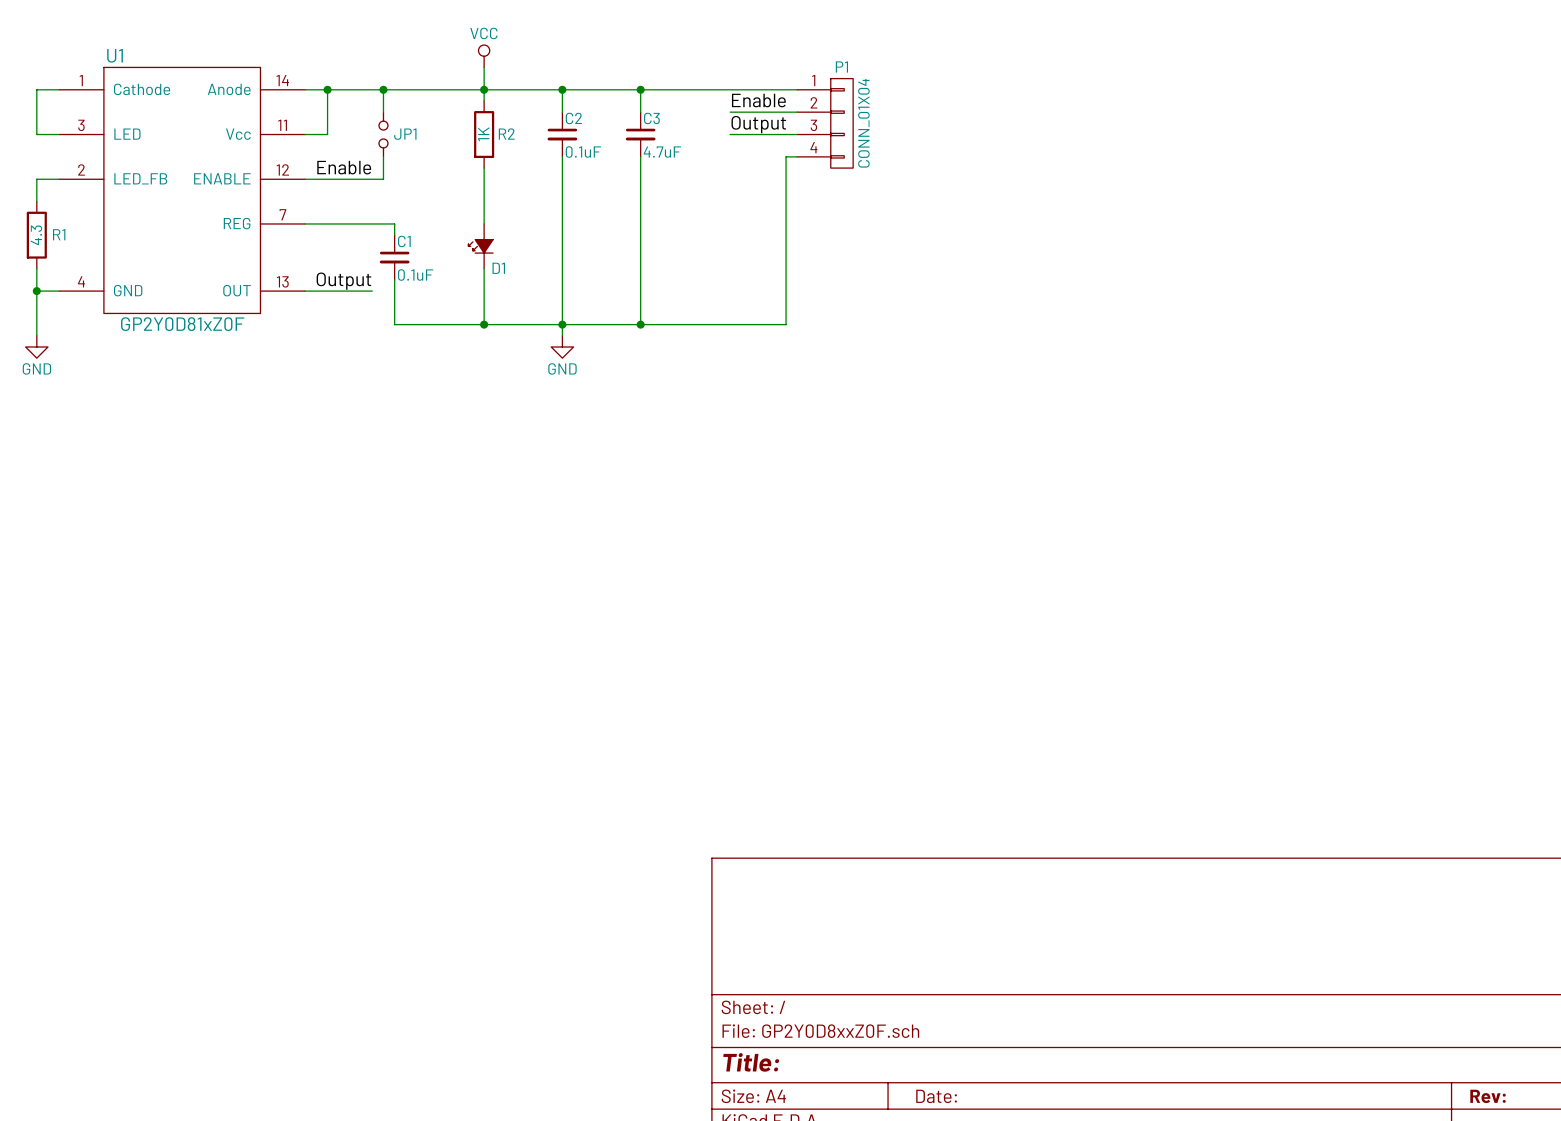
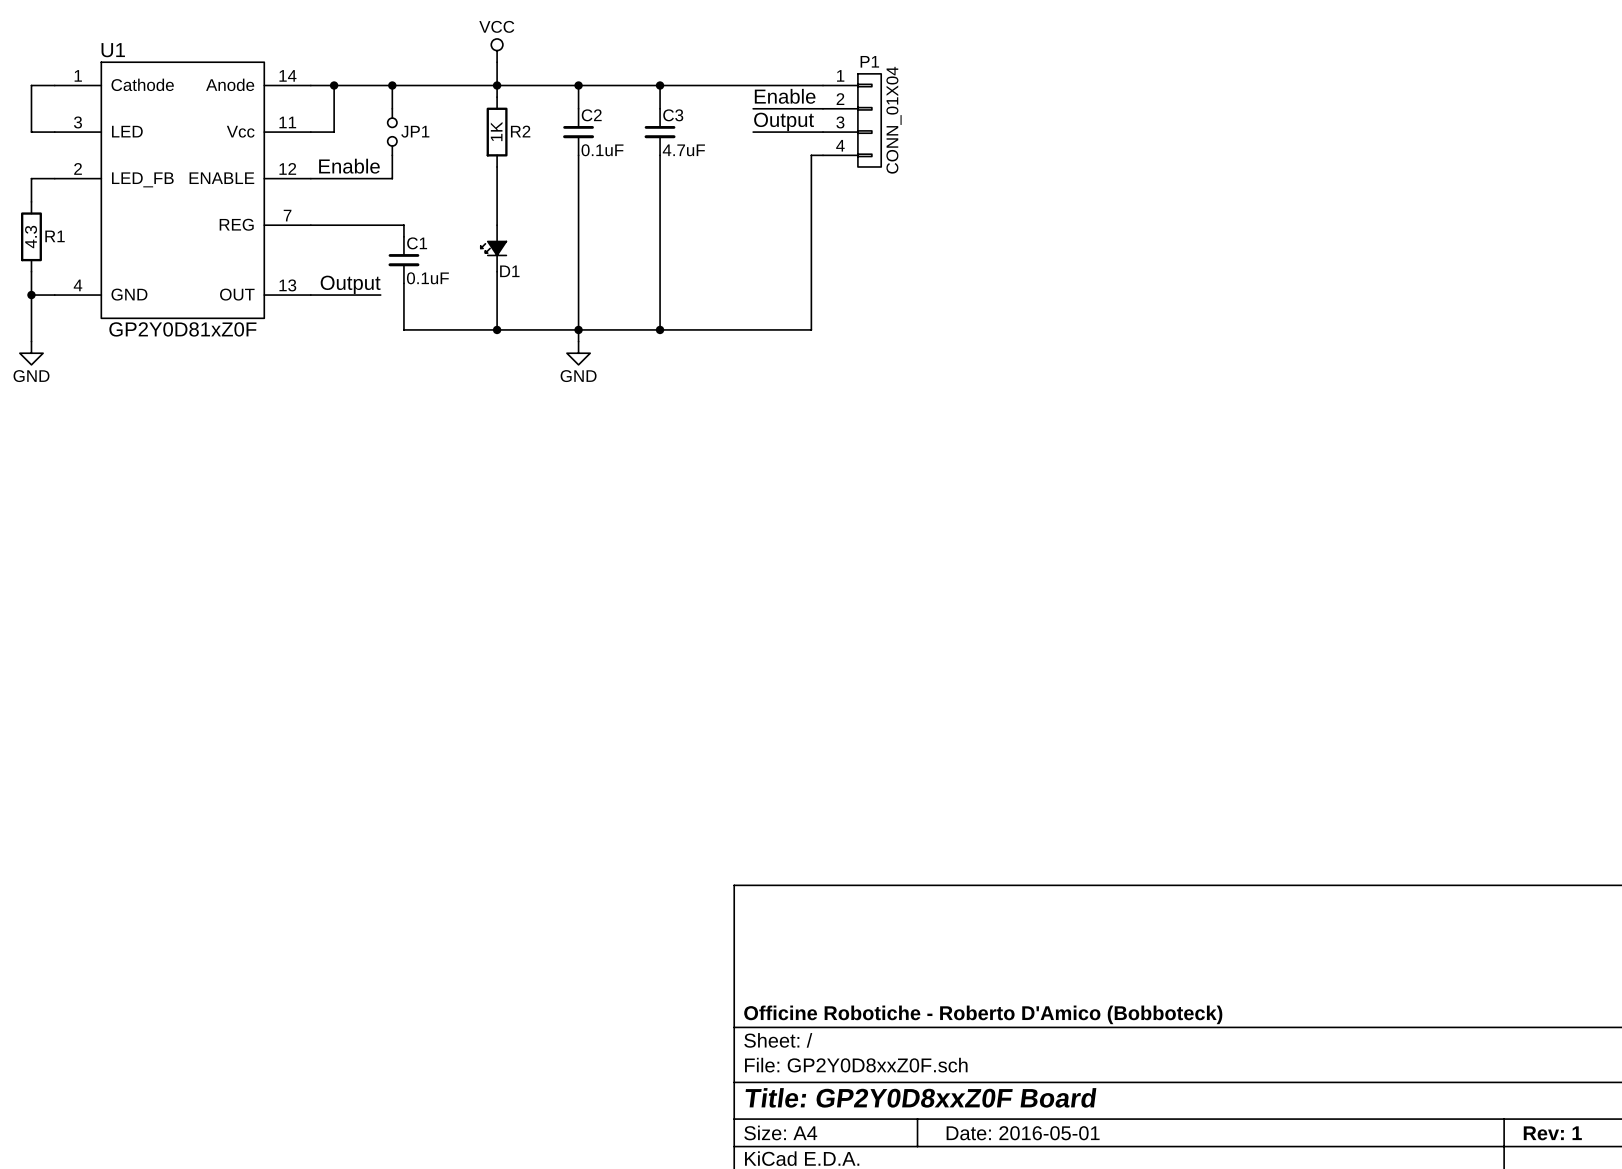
title block: none -> Officine Robotiche - Roberto D'Amico (Bobboteck) (983, 1014)
title block: Title: (751, 1062) -> Title: GP2Y0D8xxZ0F Board (920, 1097)
title block: Date: (936, 1096) -> Date: 2016-05-01 (1023, 1133)
title block: Rev: (1488, 1096) -> Rev: 1 (1552, 1133)

